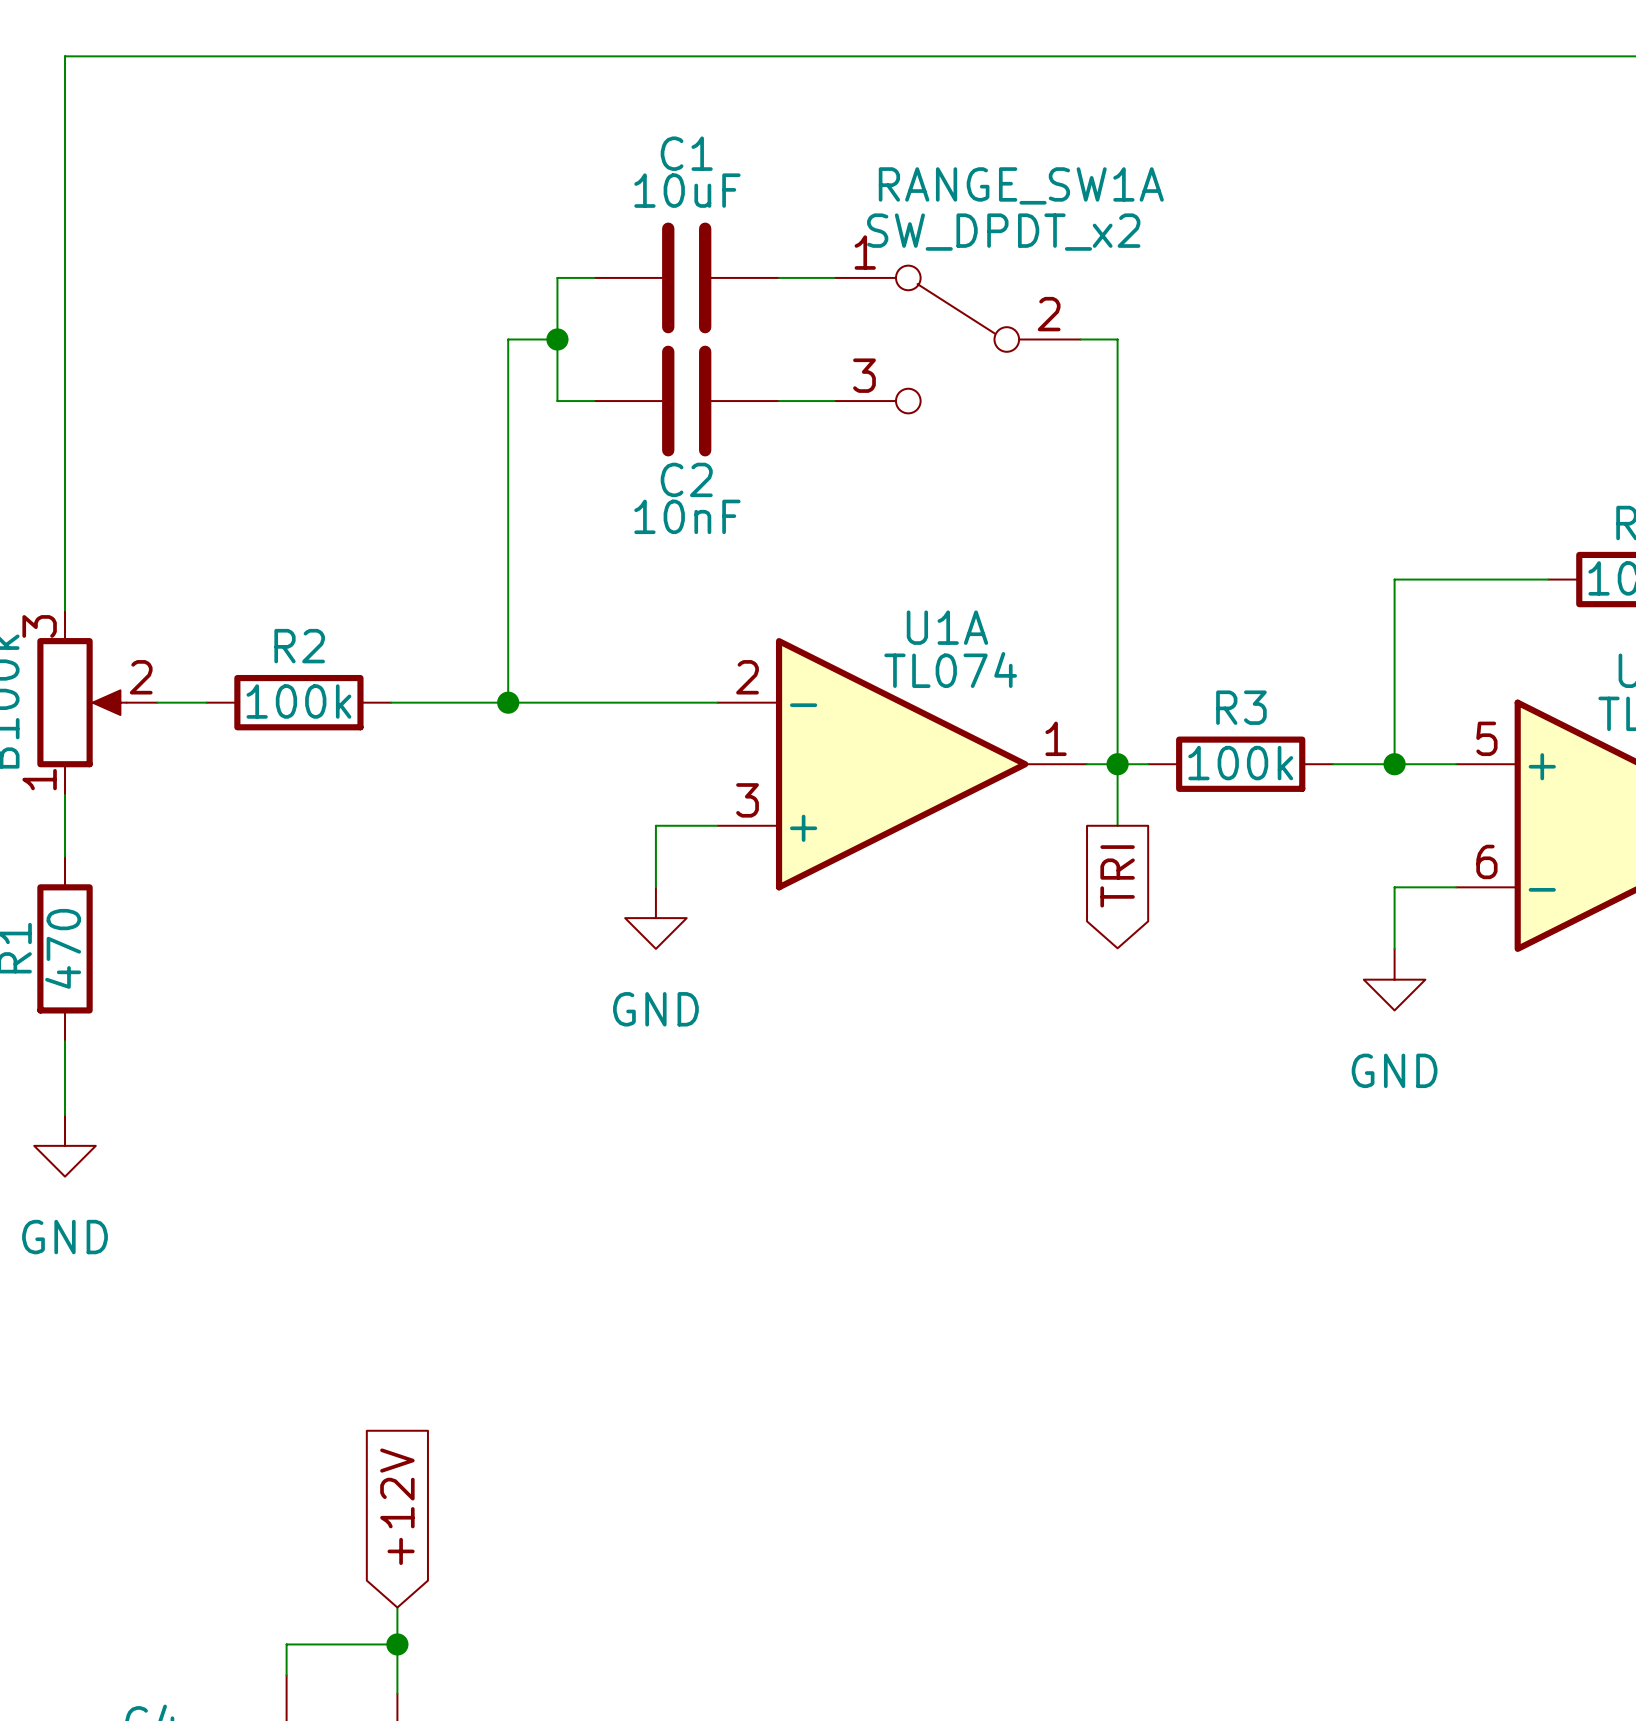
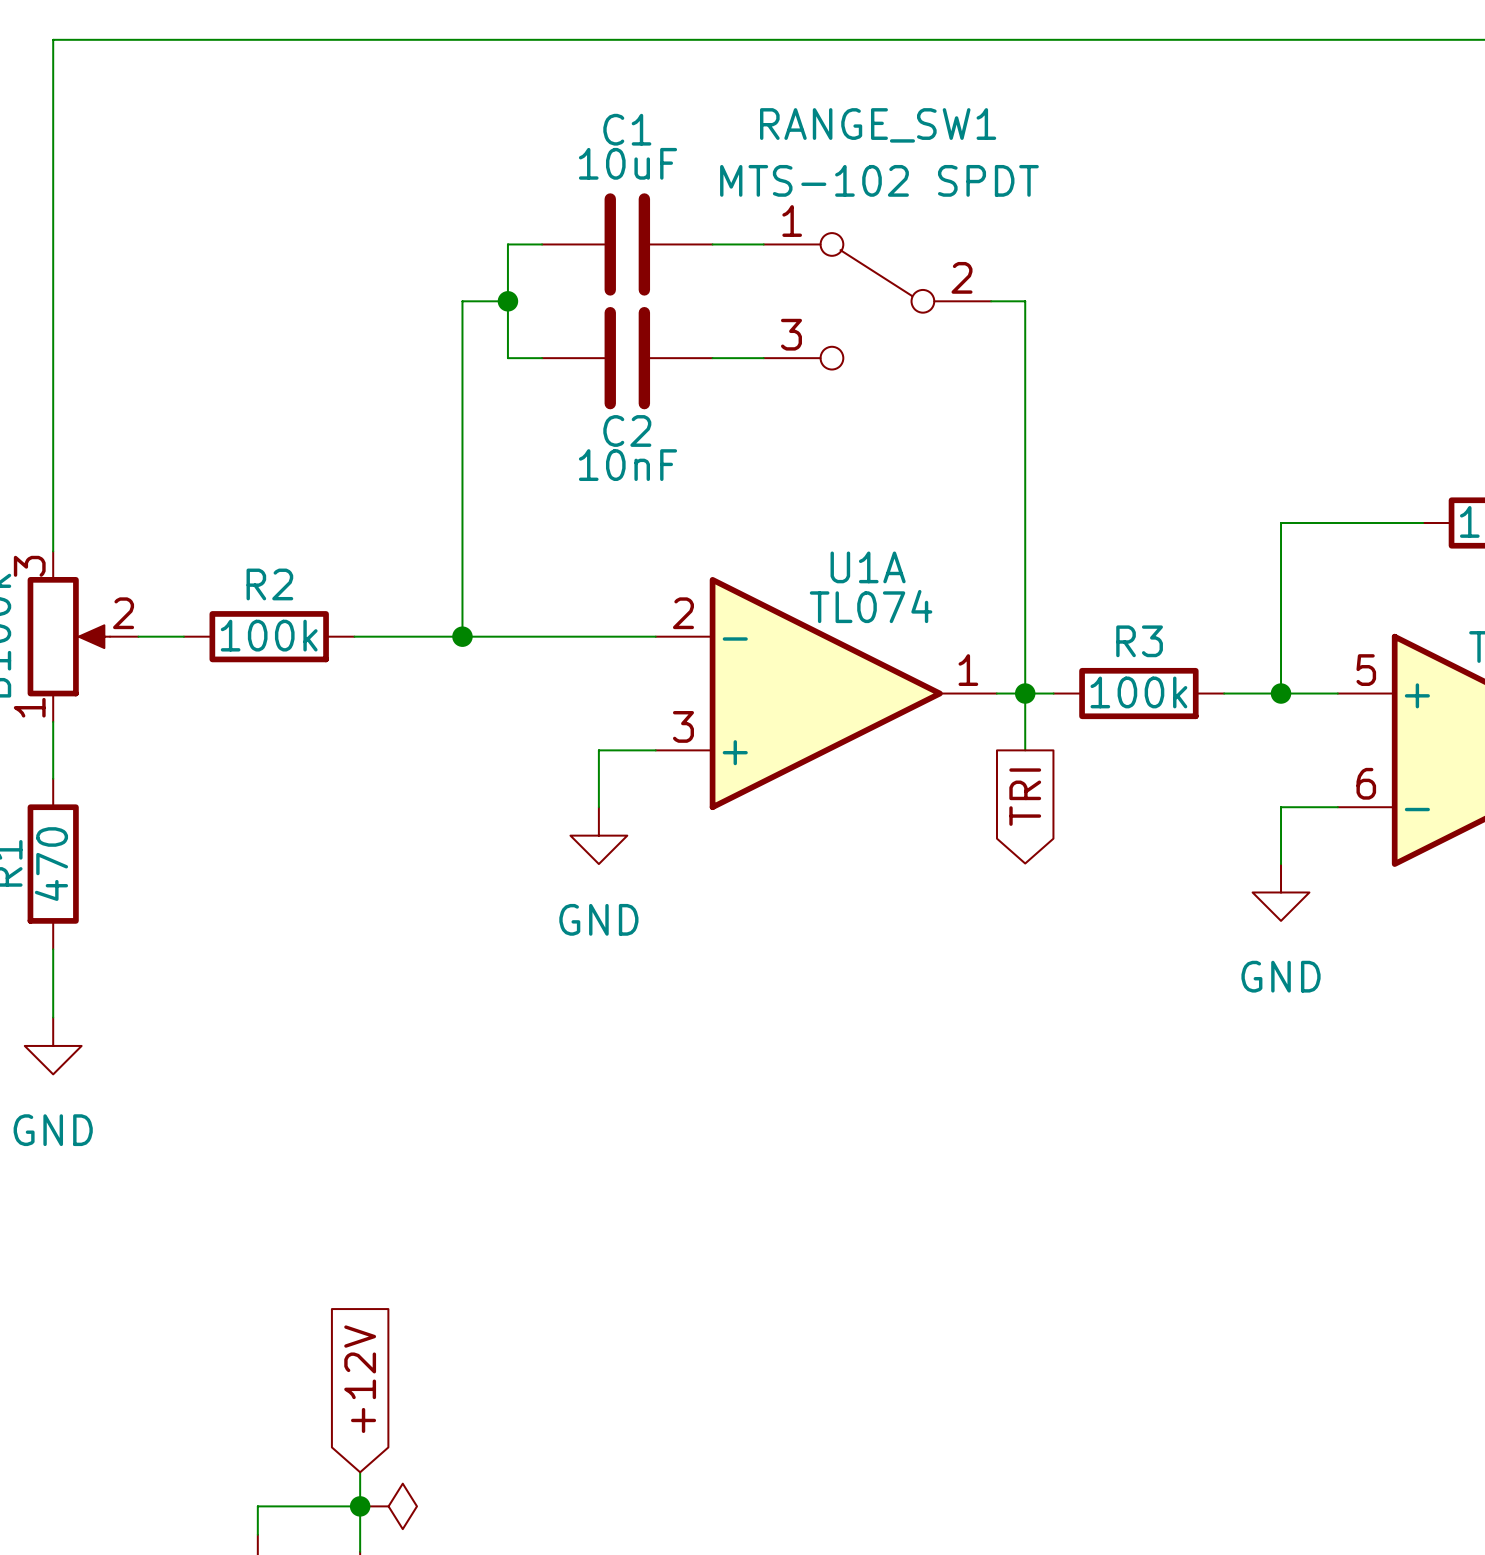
RANGE_SW1A name: RANGE_SW1A (1021, 185) -> RANGE_SW1 (878, 125)
RANGE_SW1A value: SW_DPDT_x2 (1003, 232) -> MTS-102 SPDT (879, 180)
power symbol: none -> (388, 1506)

